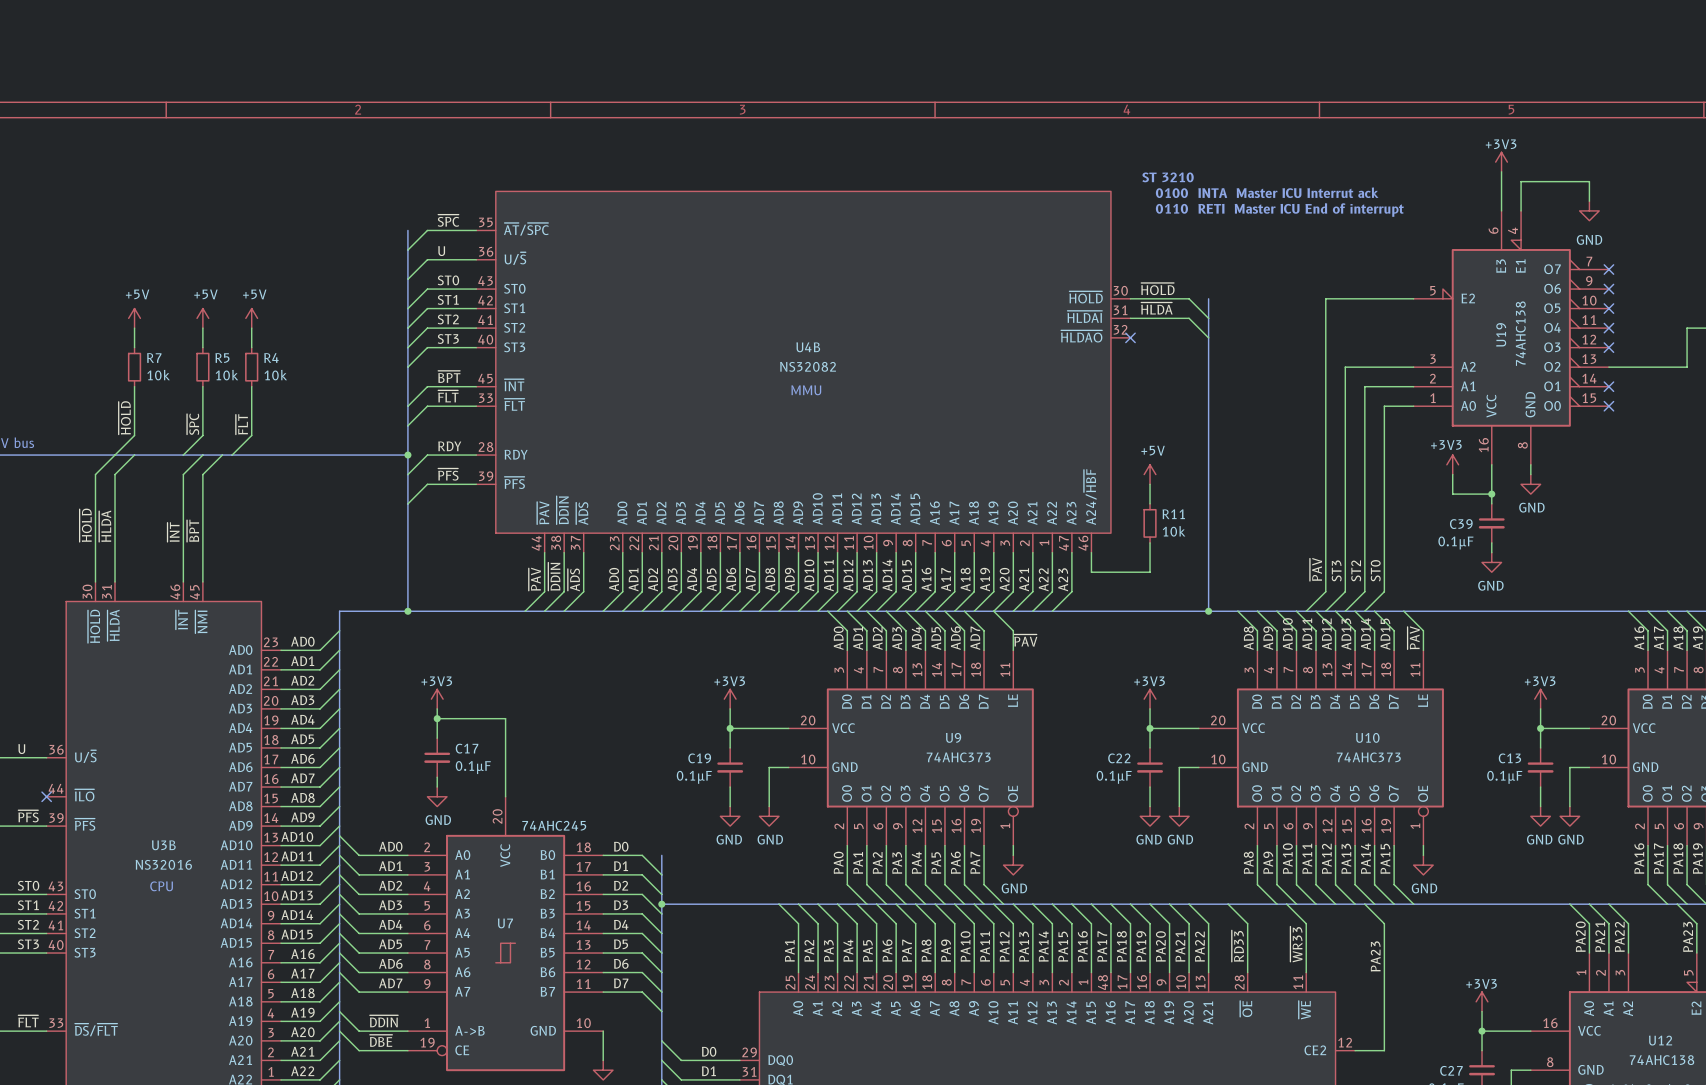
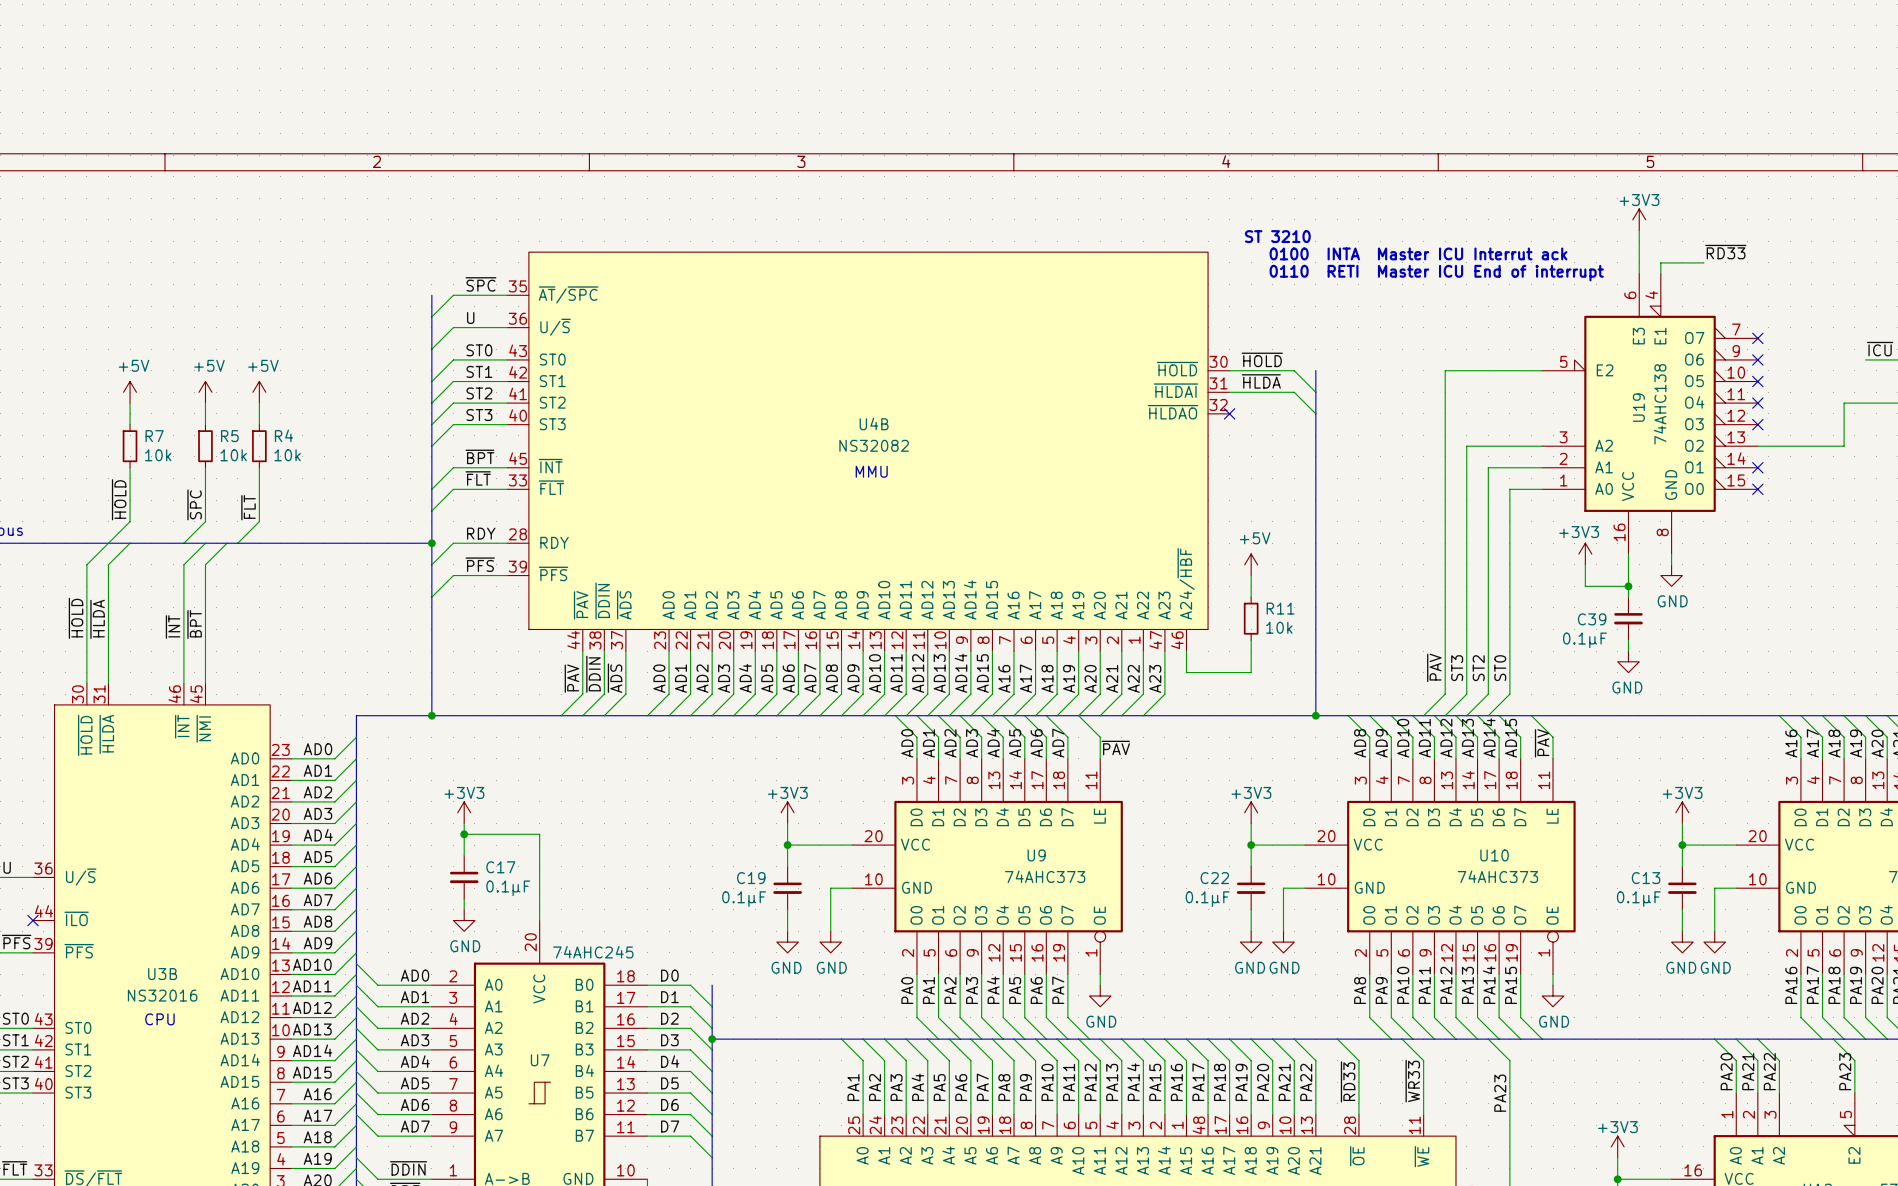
label: none -> ~{RD33} (1725, 252)
wire: (1521, 201) (1521, 181) (1589, 181) (1589, 201) -> (1660, 262) (1703, 262)
power symbol: GND (1589, 210) -> none

